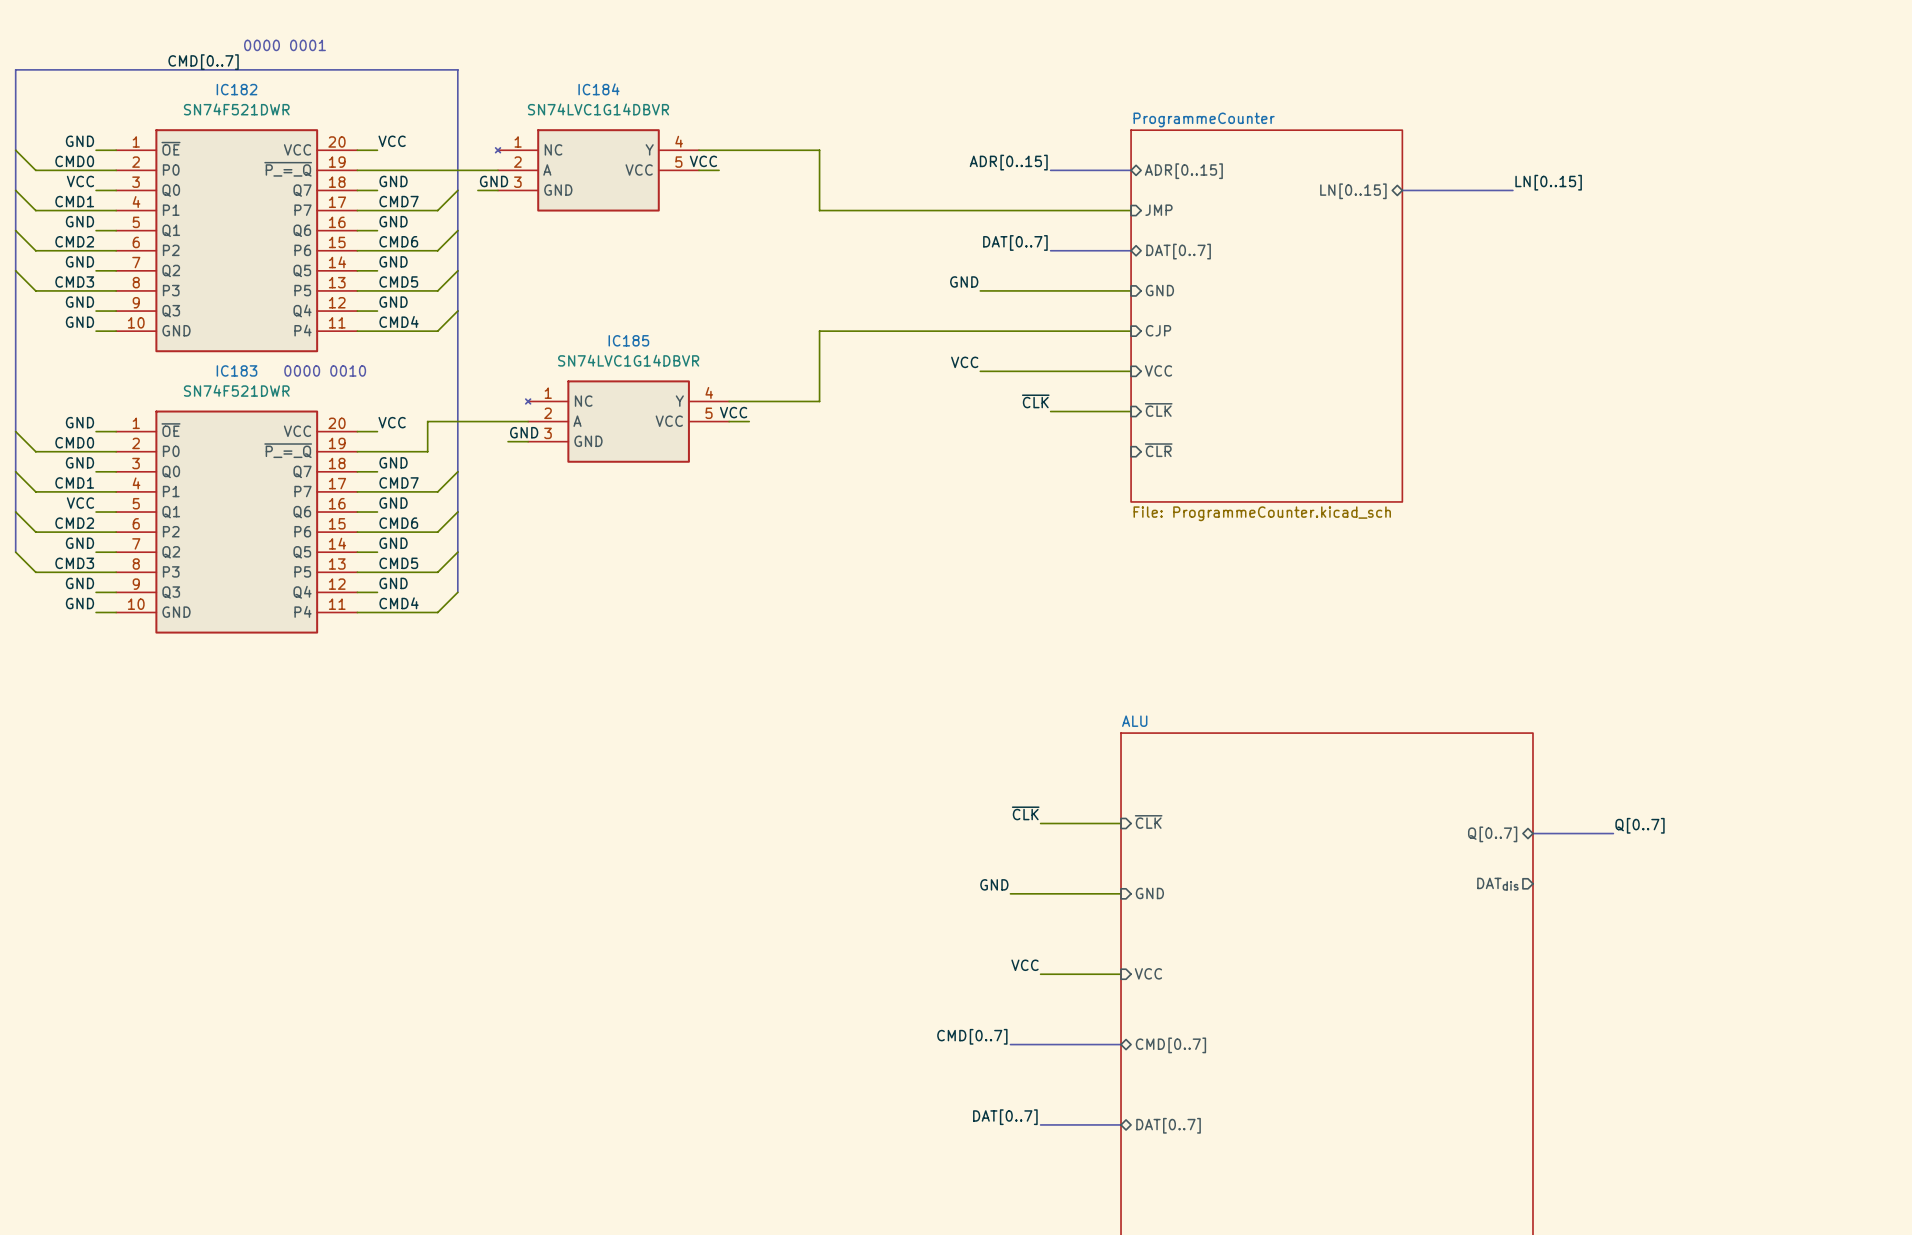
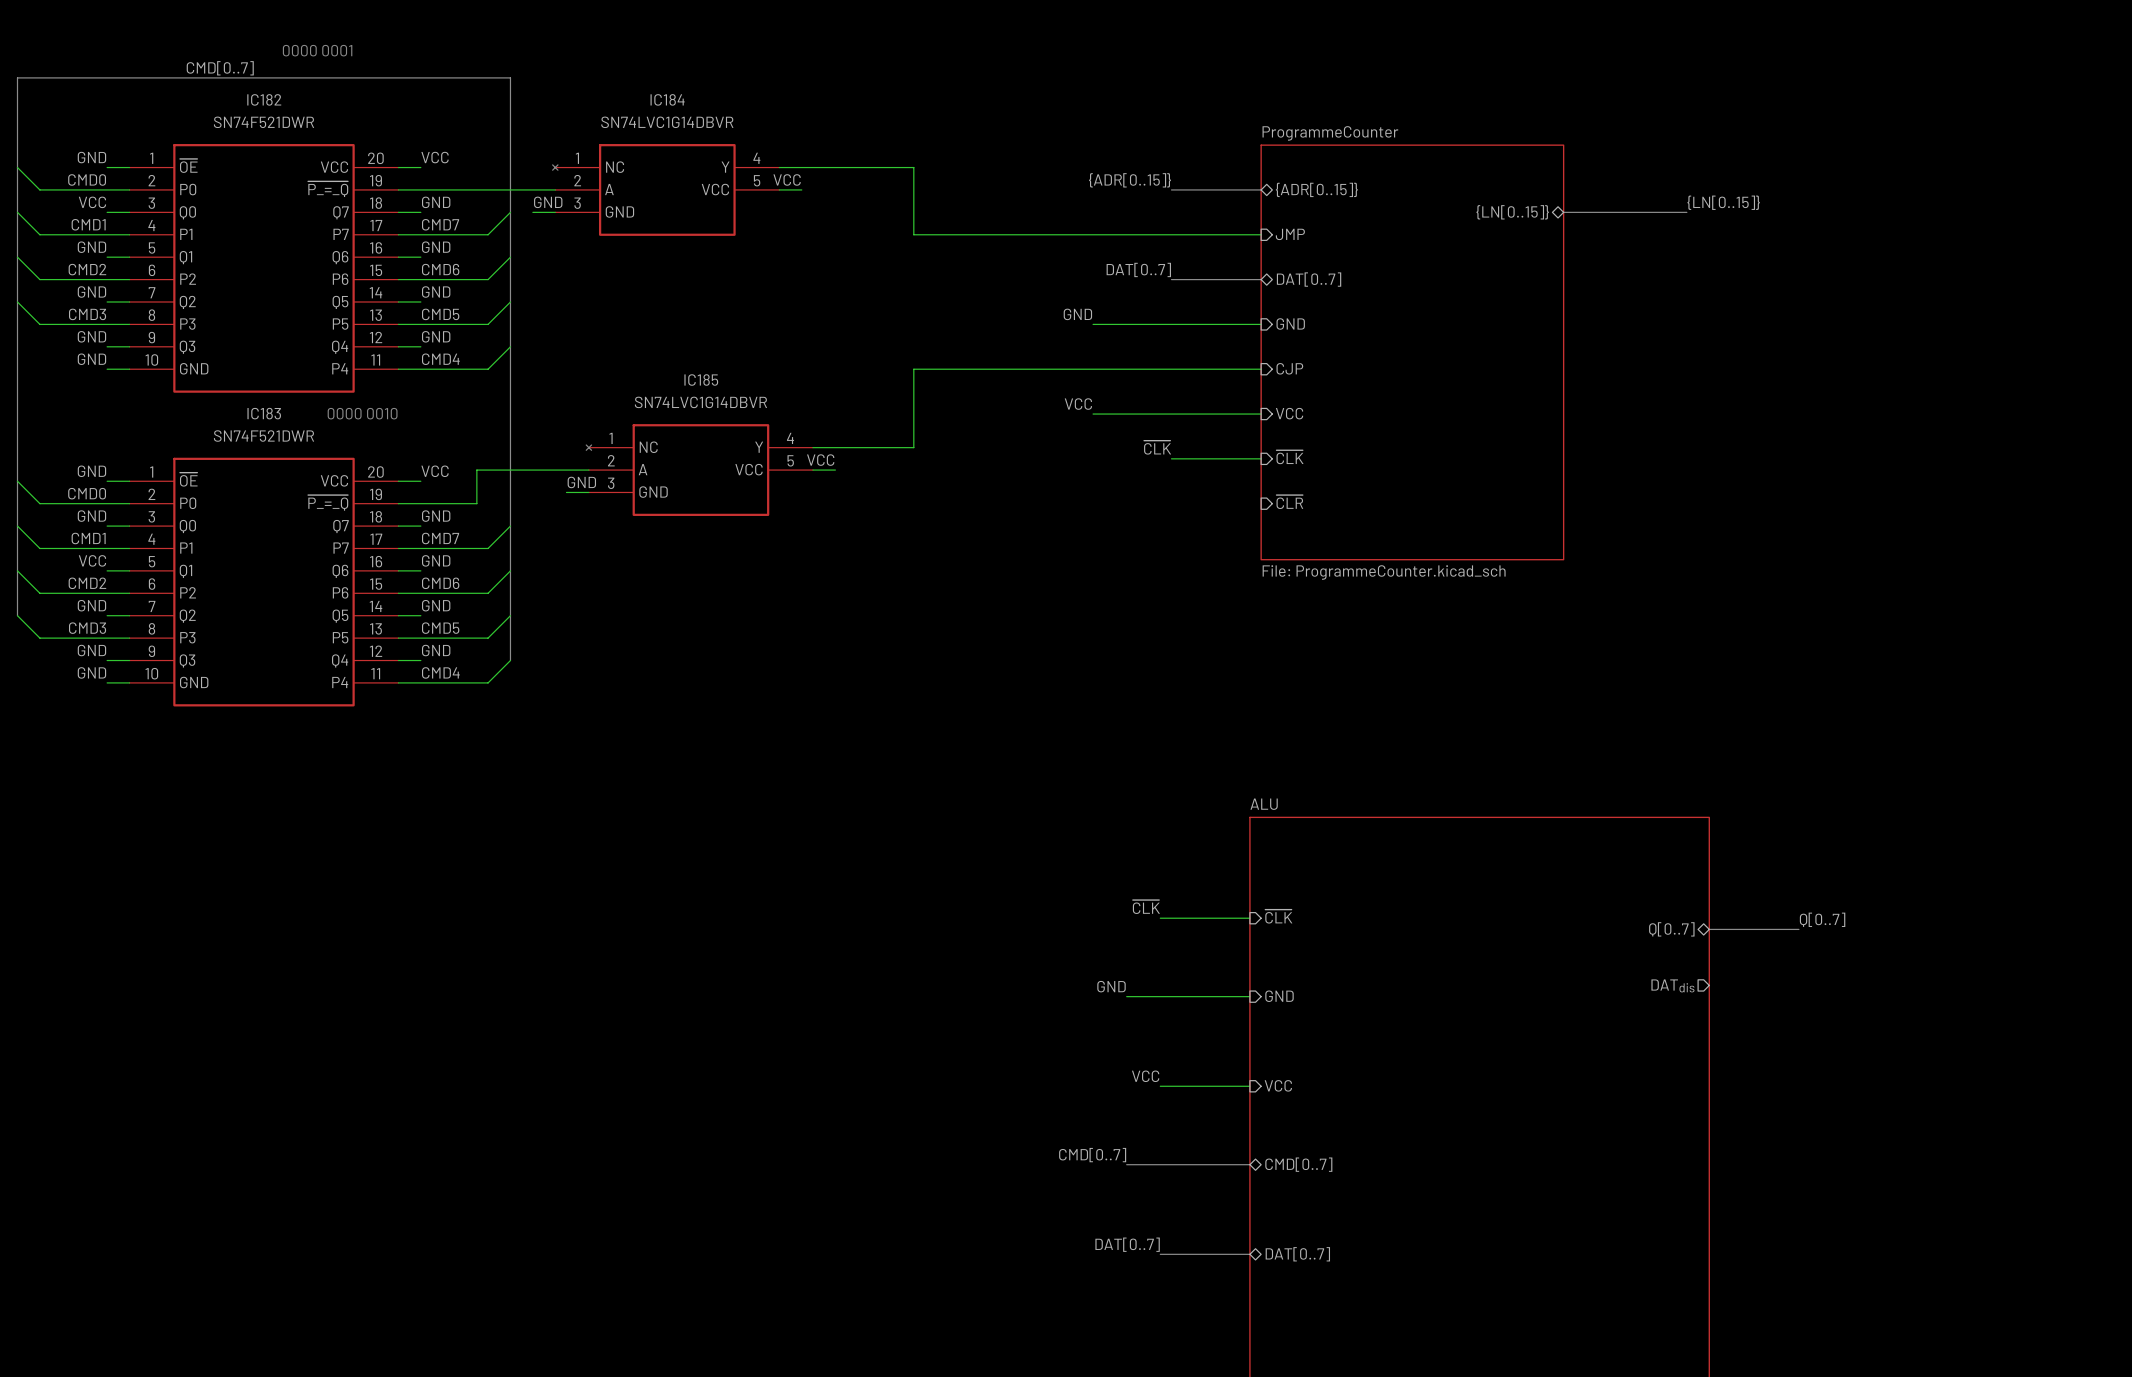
label: ADR[0..15] (1008, 162) -> {ADR[0..15]} (1130, 180)
sheet pin: ADR[0..15] (1183, 171) -> {ADR[0..15]} (1316, 189)
label: LN[0..15] (1548, 182) -> {LN[0..15]} (1723, 202)
sheet pin: LN[0..15] (1353, 191) -> {LN[0..15]} (1512, 212)

